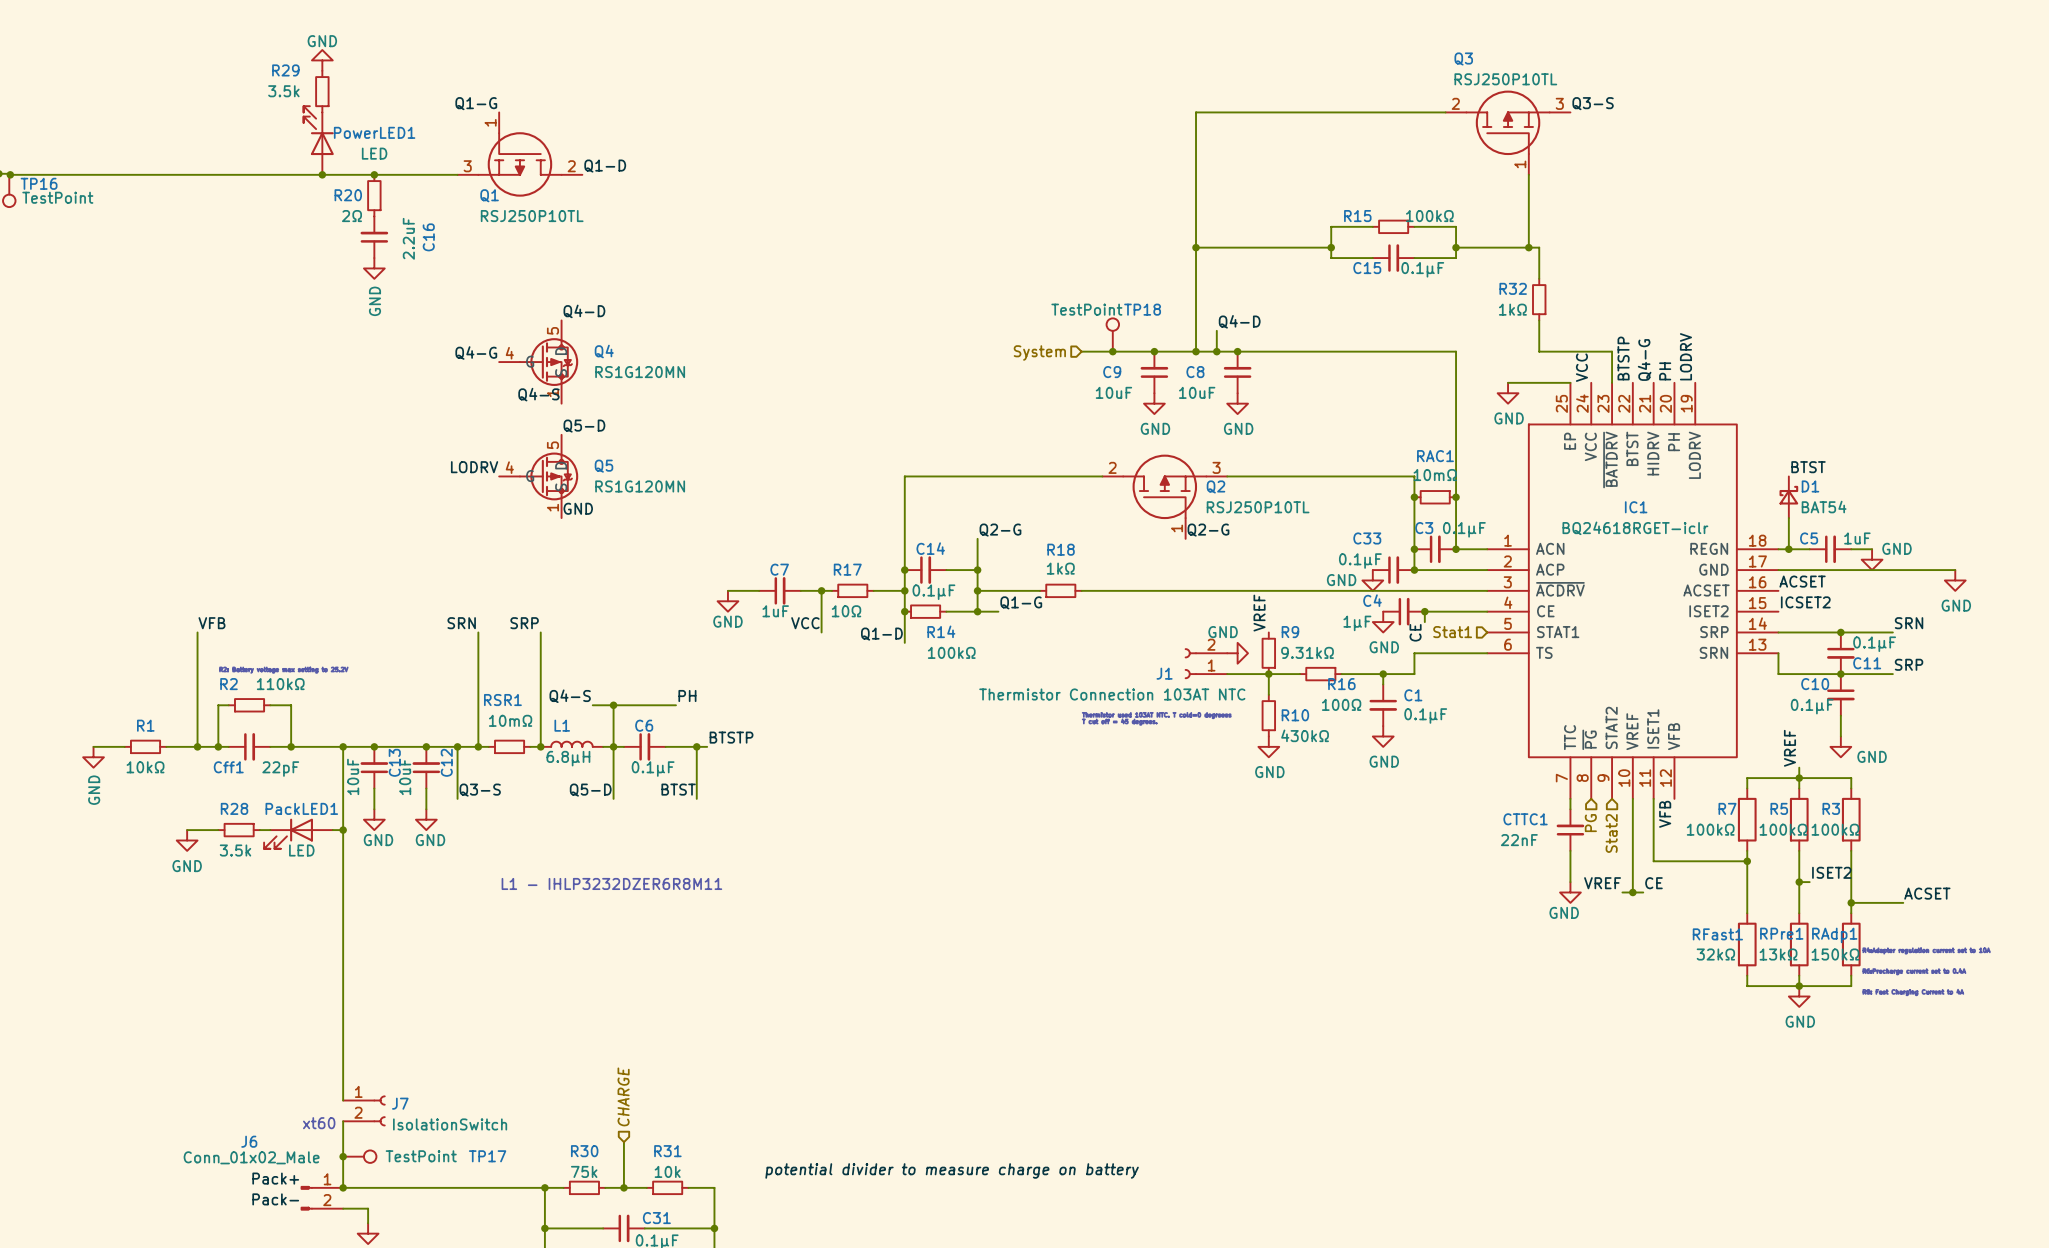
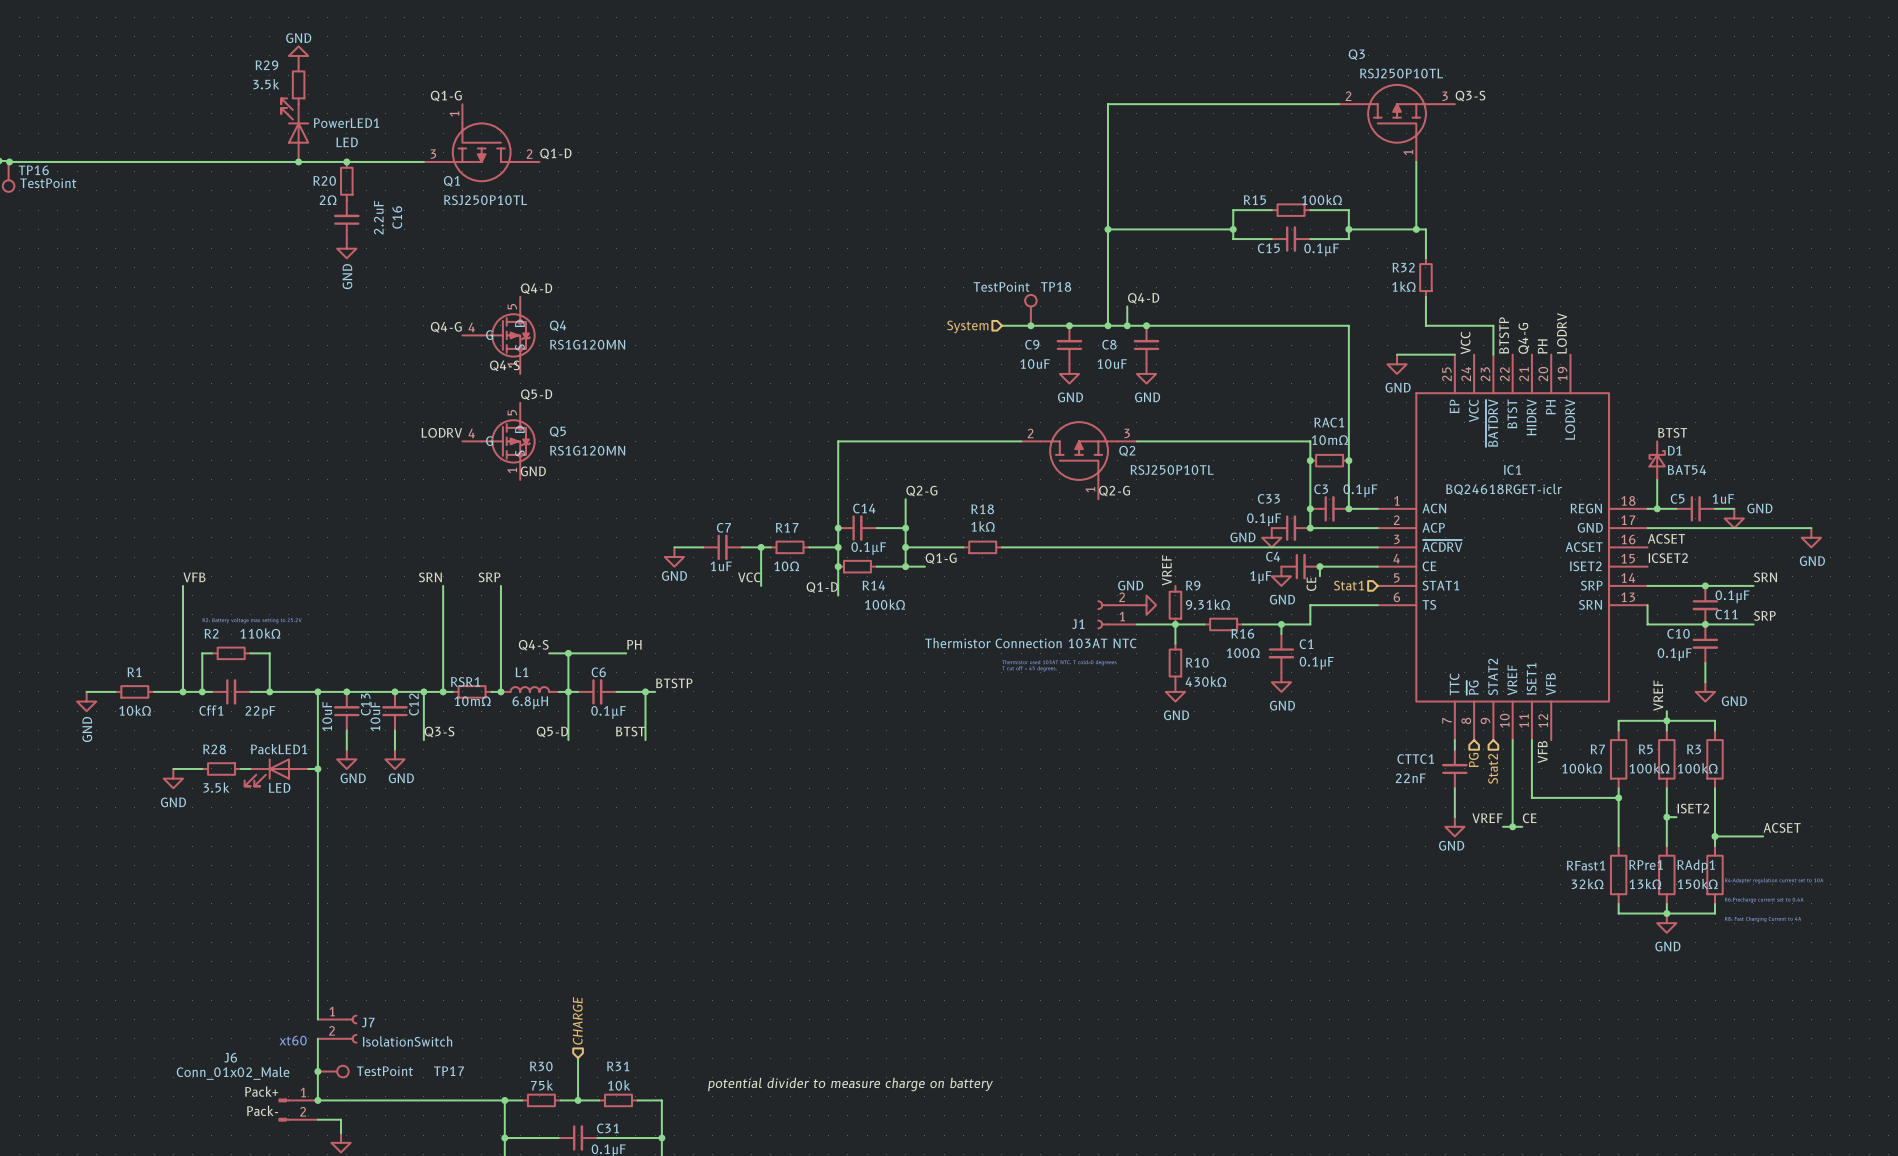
RSR1 name position: RSR1 (502, 700) -> RSR1 (465, 681)
RSR1 value position: 10mΩ (510, 720) -> 10mΩ (472, 701)
text: L1 - IHLP3232DZER6R8M11 (611, 883) -> none

